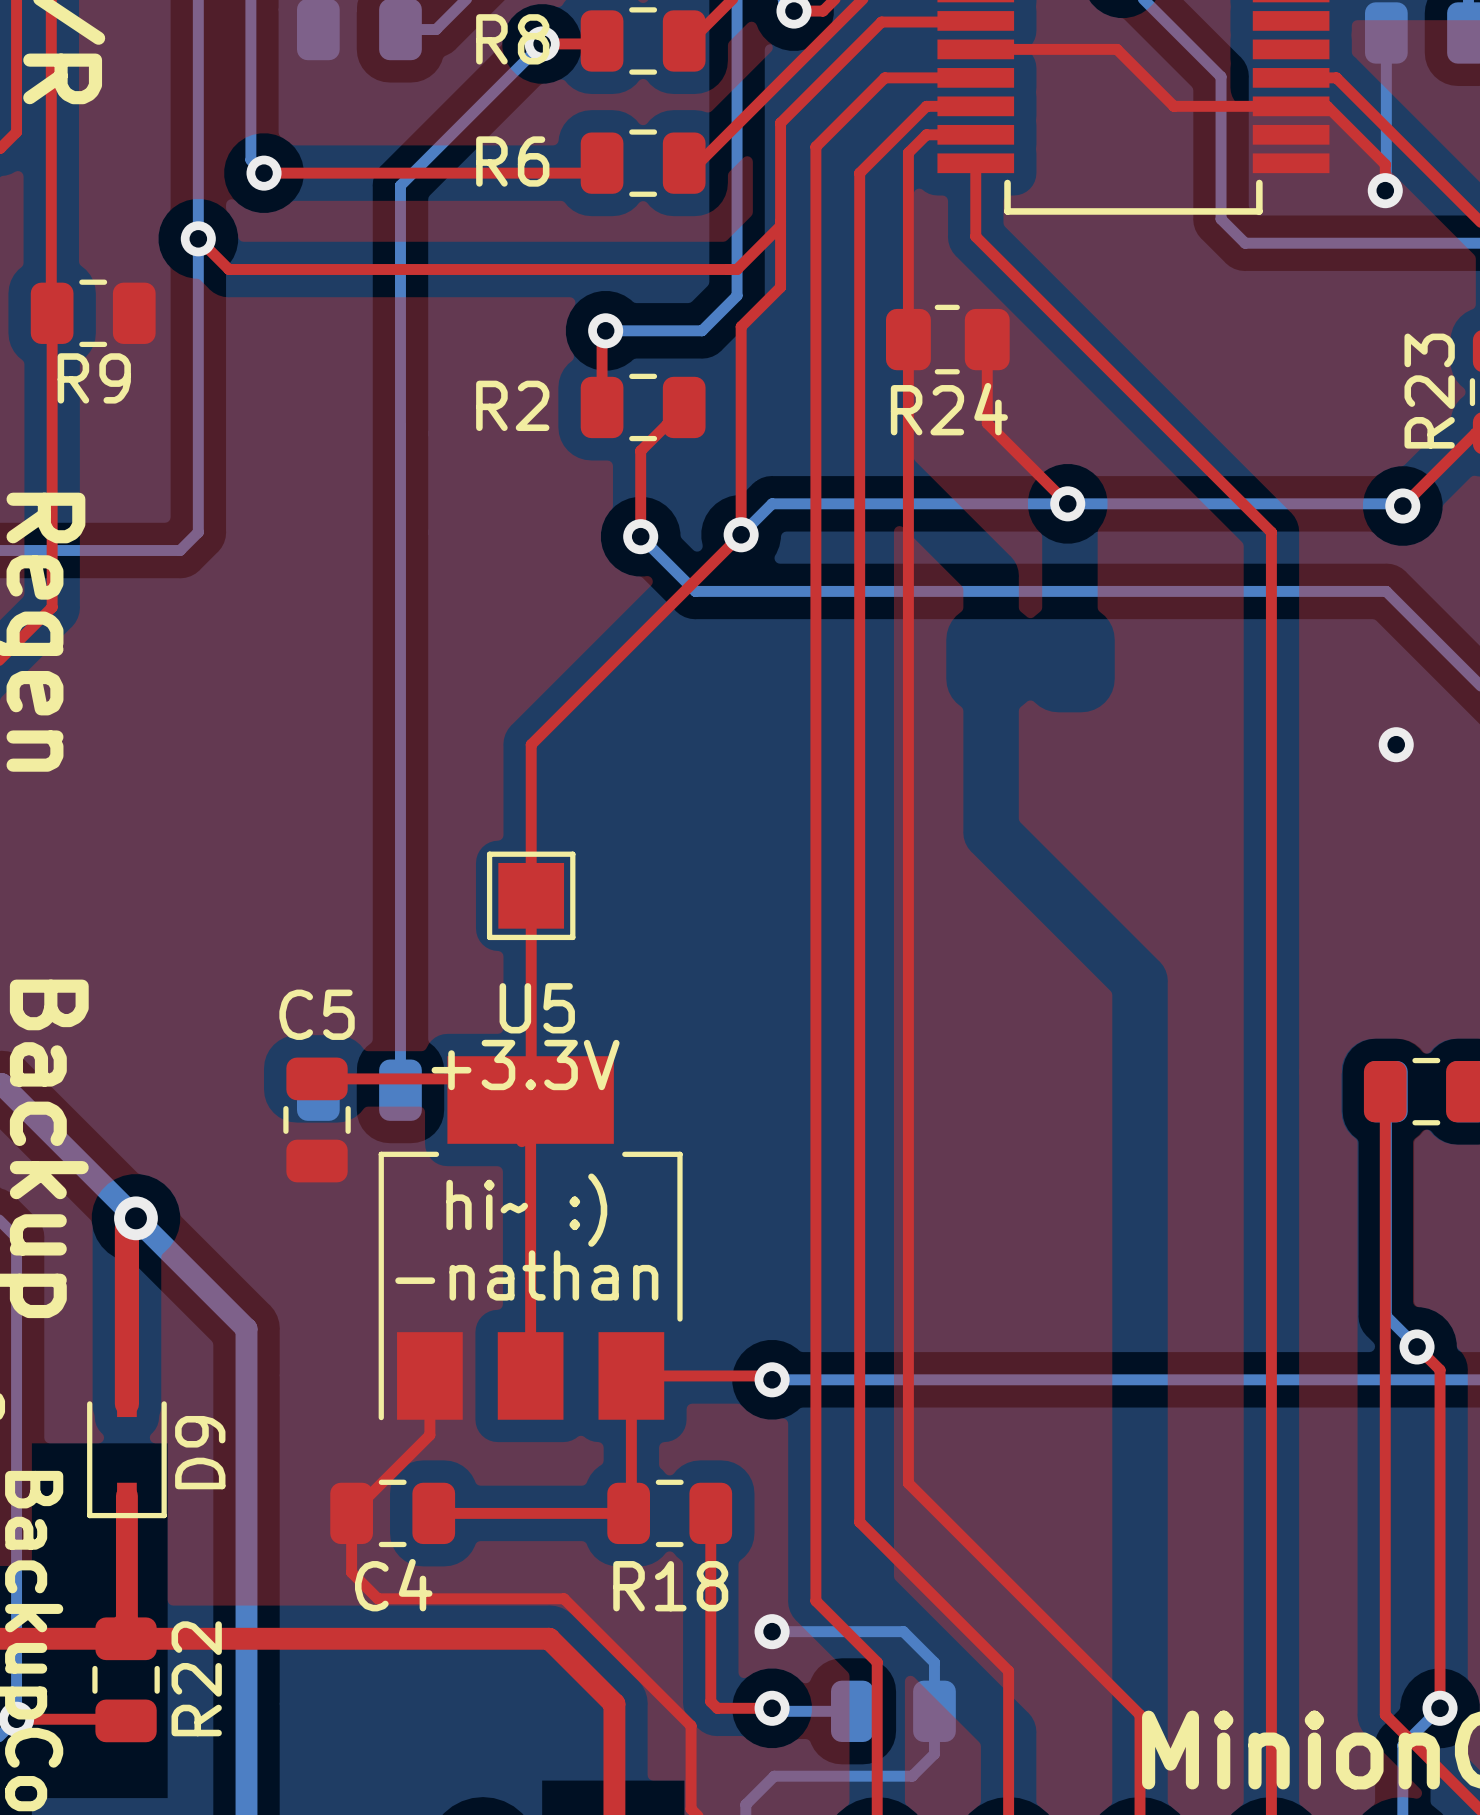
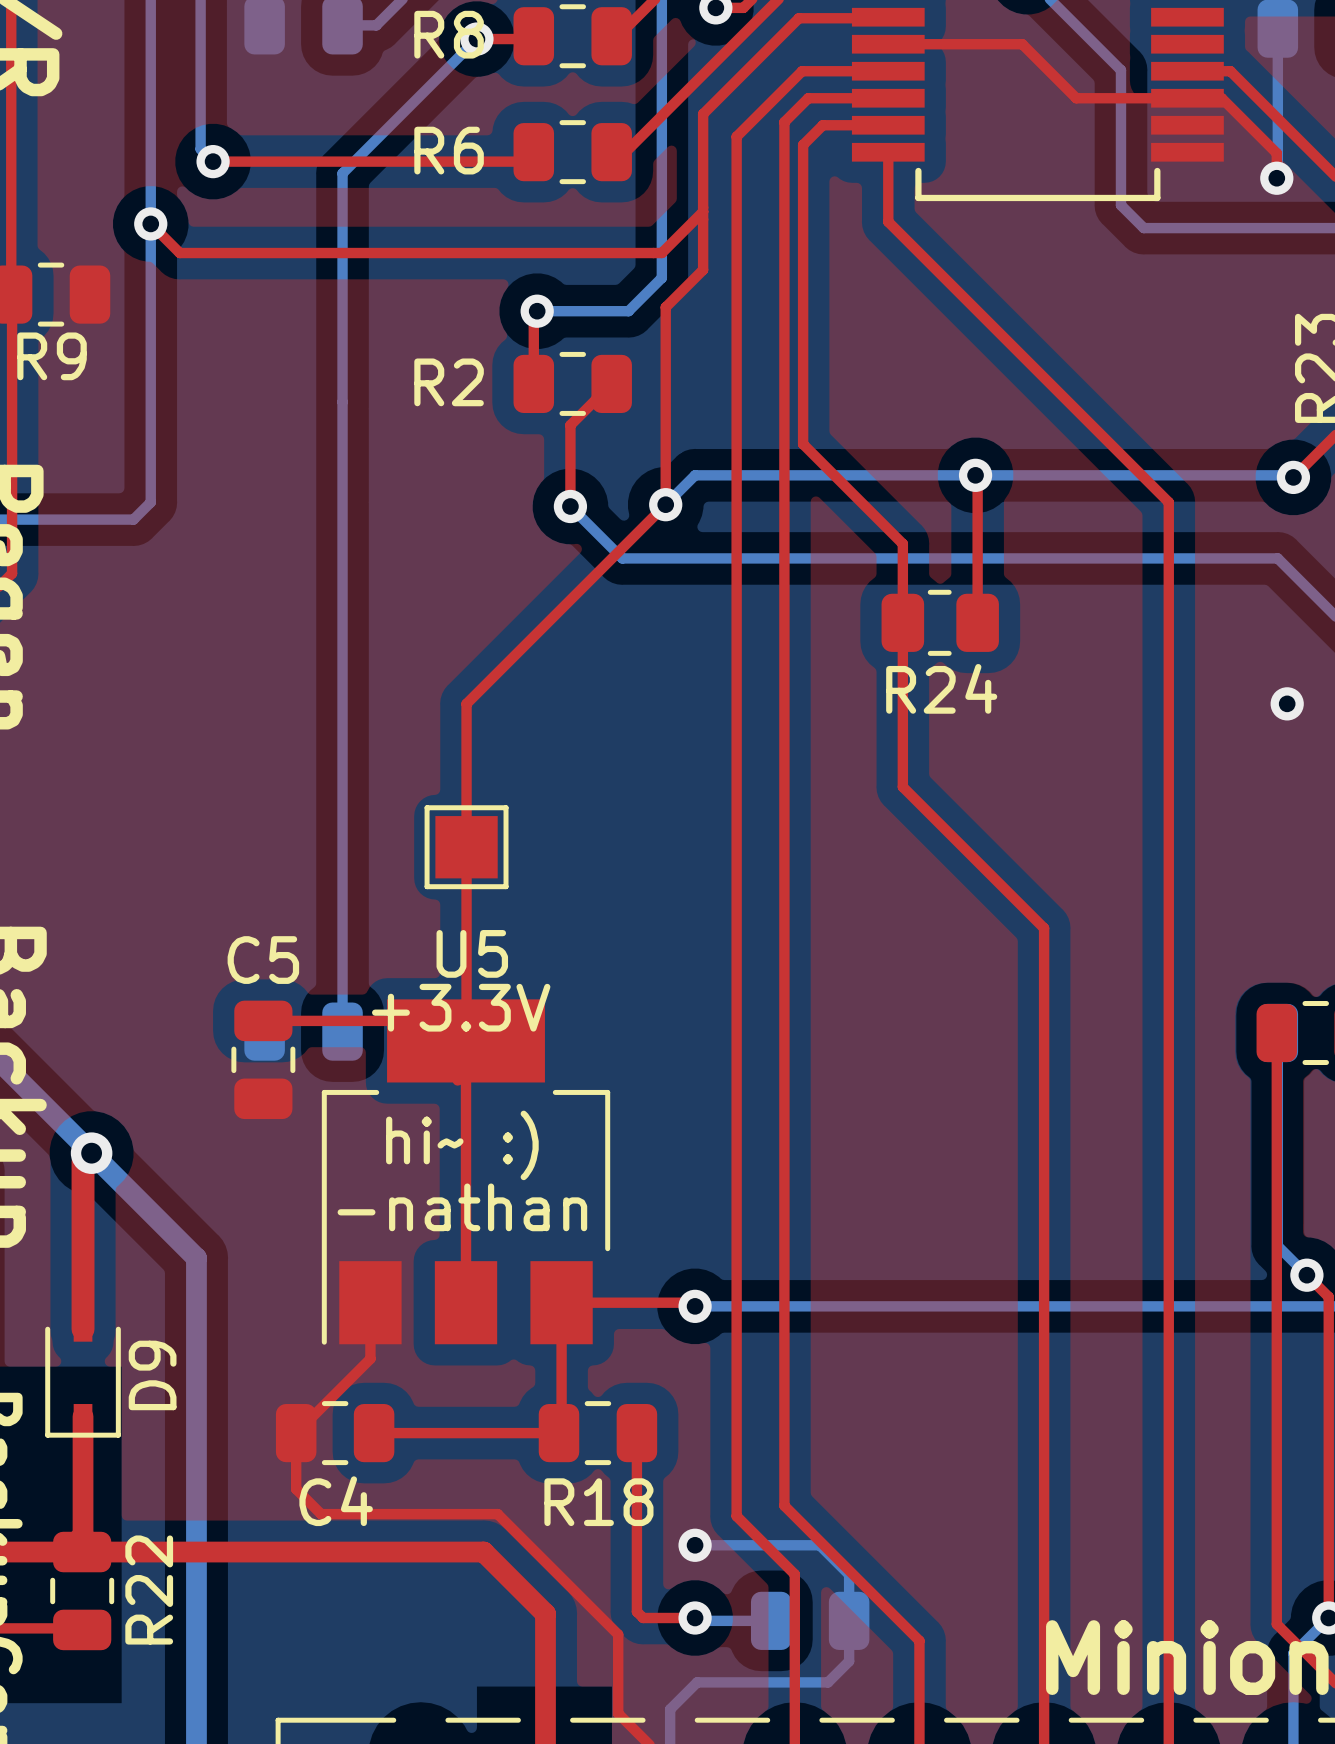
top track: (926, 106) (859, 173) (859, 1522) (1008, 1671) (1008, 1732) -> (841, 98) (808, 98) (784, 122) (784, 1505) (919, 1640)
top track: (926, 134) (908, 152) (908, 1483) (1140, 1714) -> (841, 125) (822, 125) (803, 144) (803, 444) (902, 543) (902, 786) (1044, 928) (1044, 1624)
R24 position: (947, 339) -> (940, 622)
top track: (987, 339) (987, 423) (1067, 503) -> none
top track: none -> (977, 477) (977, 622)

